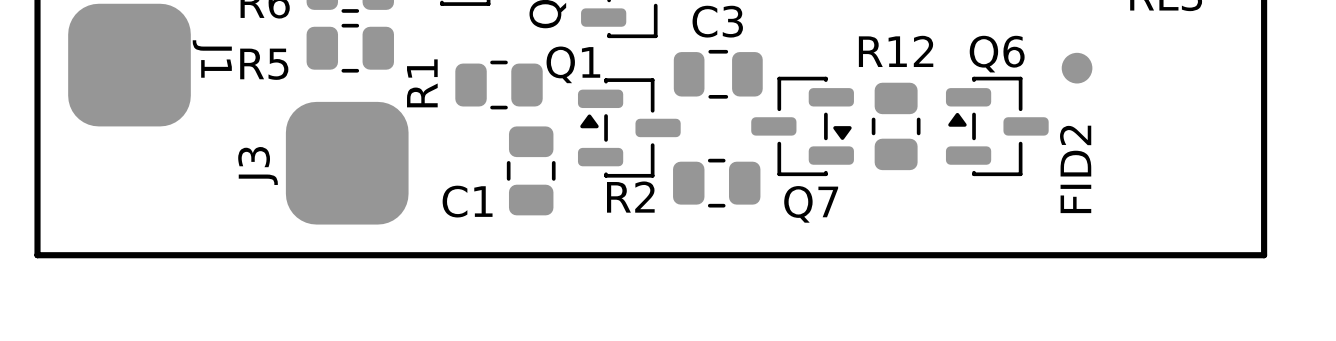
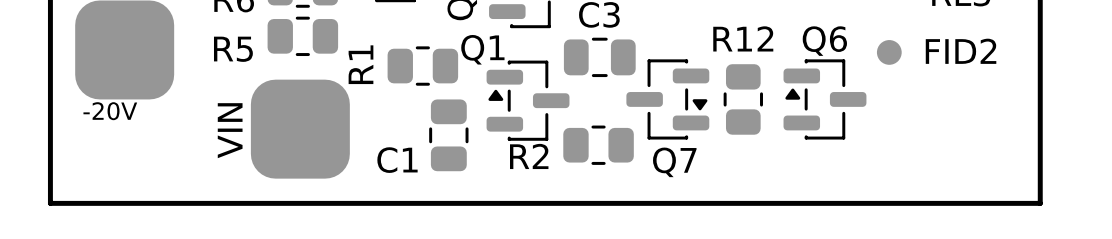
J1 name: J1 (212, 59) -> -20V (110, 111)
J3 name: J3 (258, 165) -> VIN (230, 130)
FID2 name rotation: 0° (1075, 169) -> 90° clockwise (961, 51)
FID2 name position: FID2 (1075, 169) -> FID2 (961, 51)

